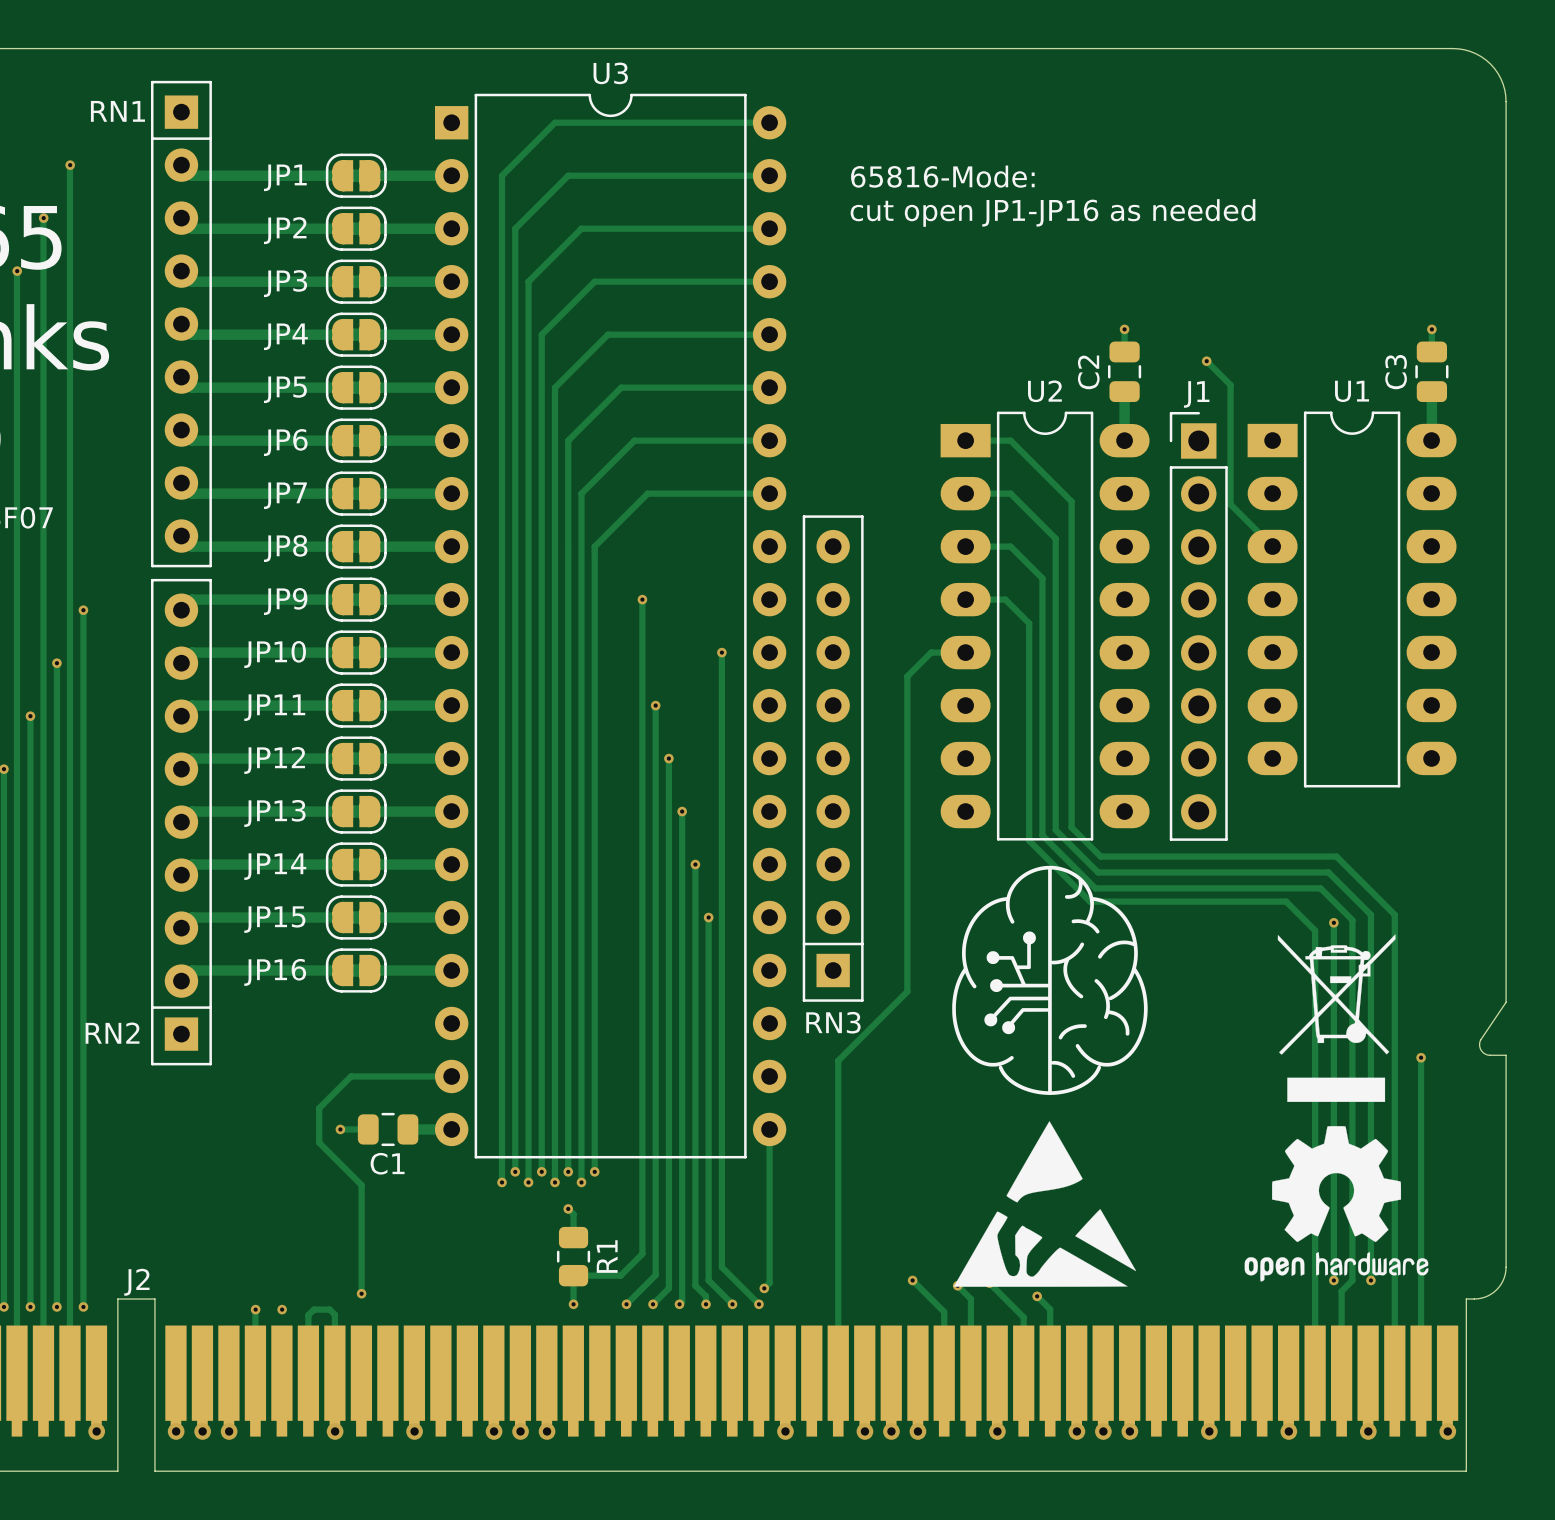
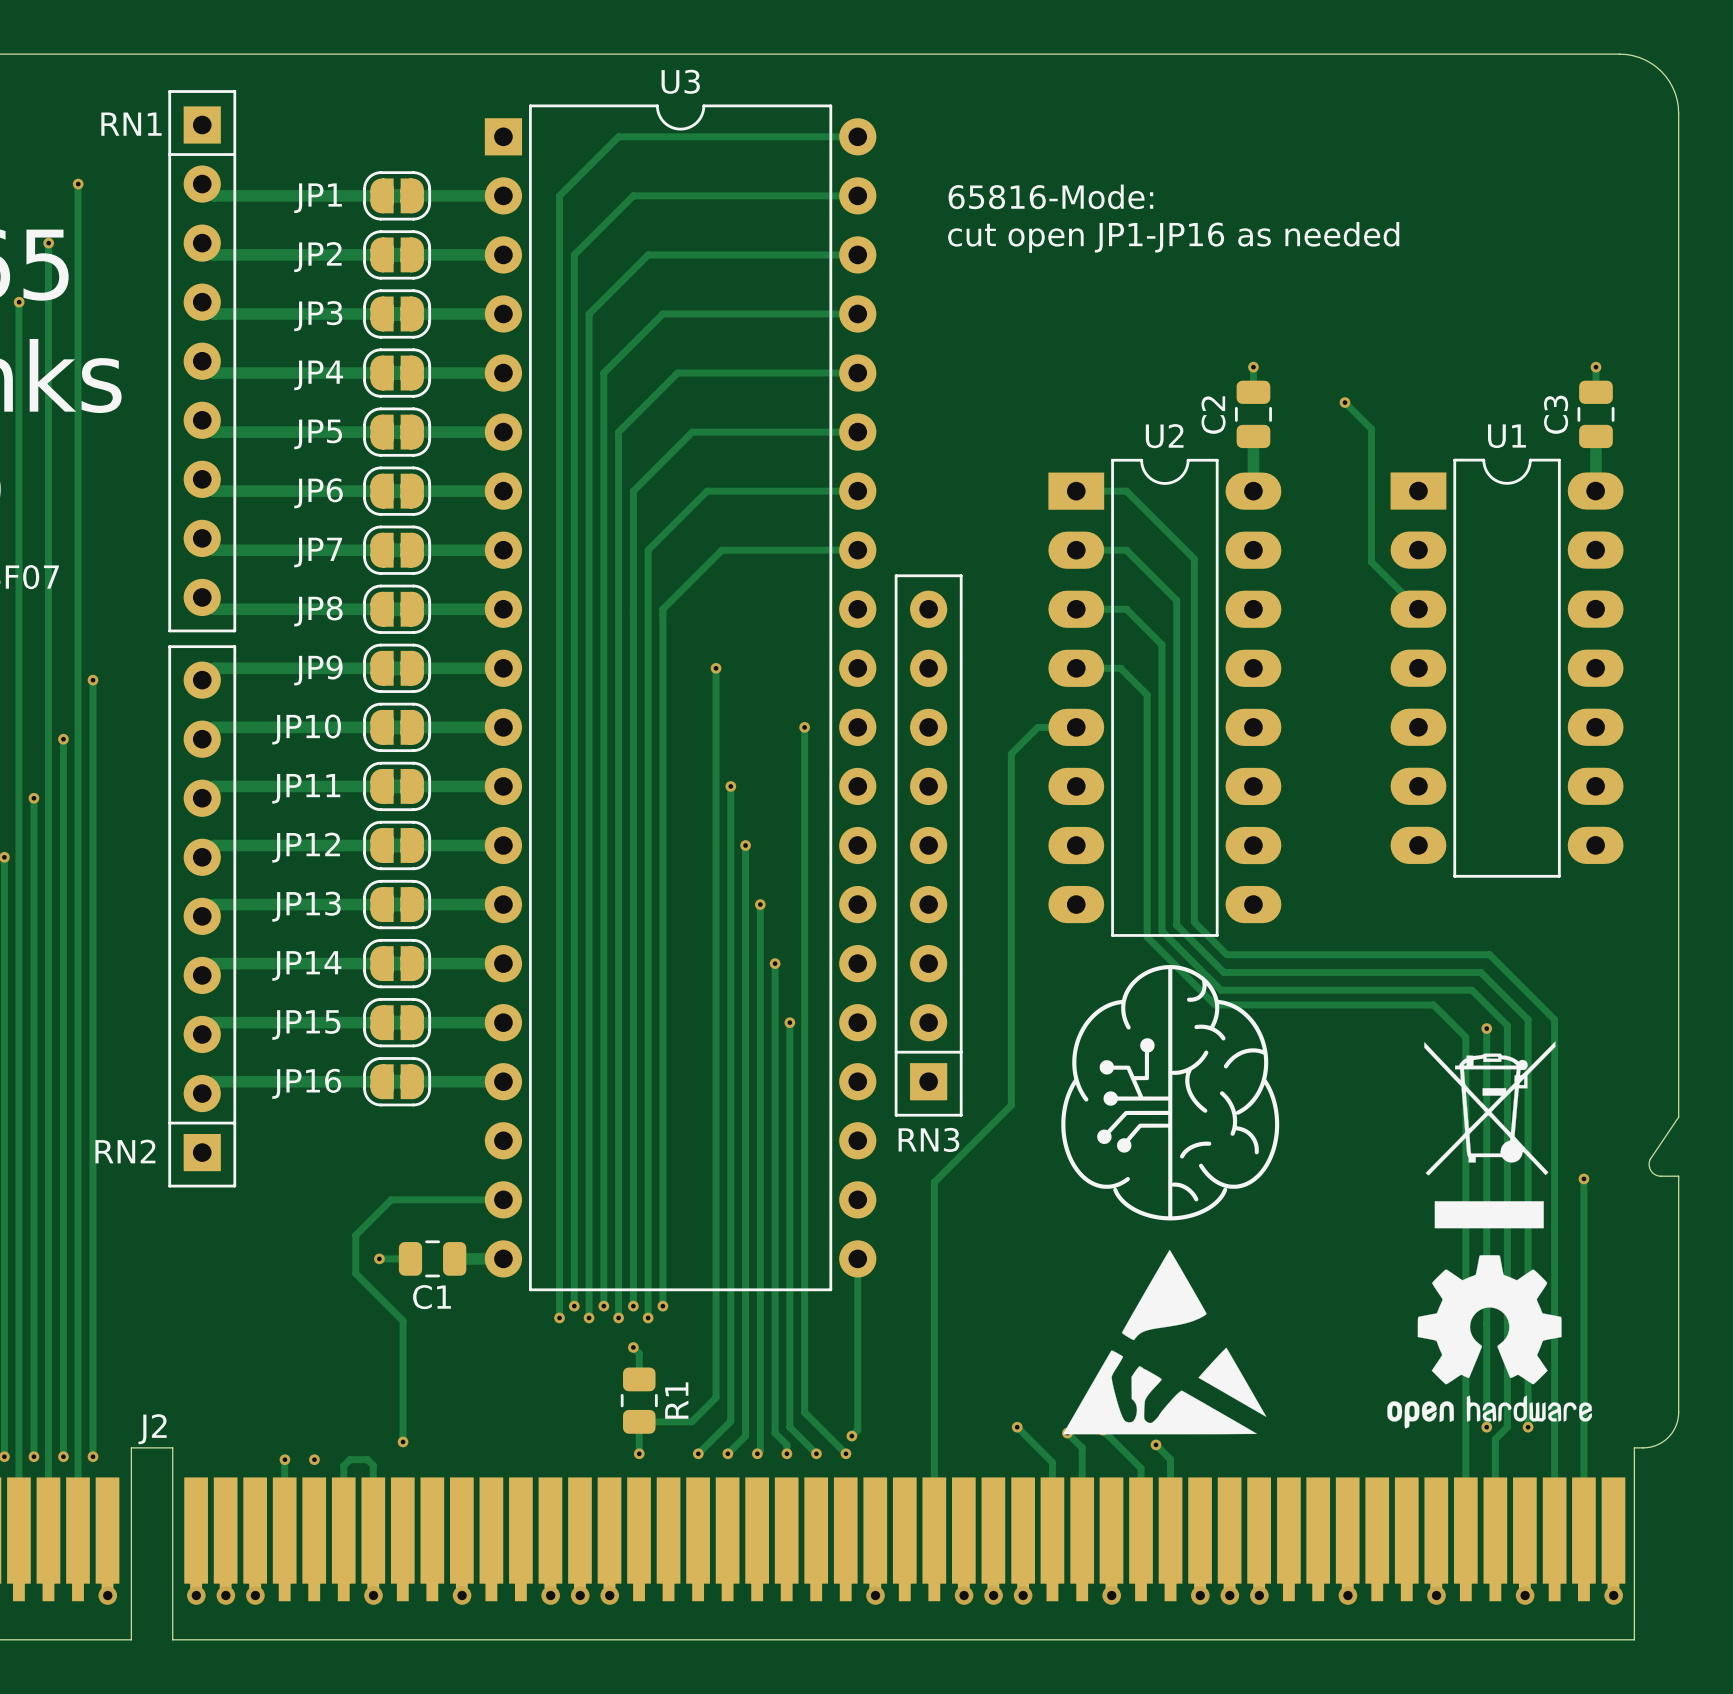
J1: (1198, 626) -> none

